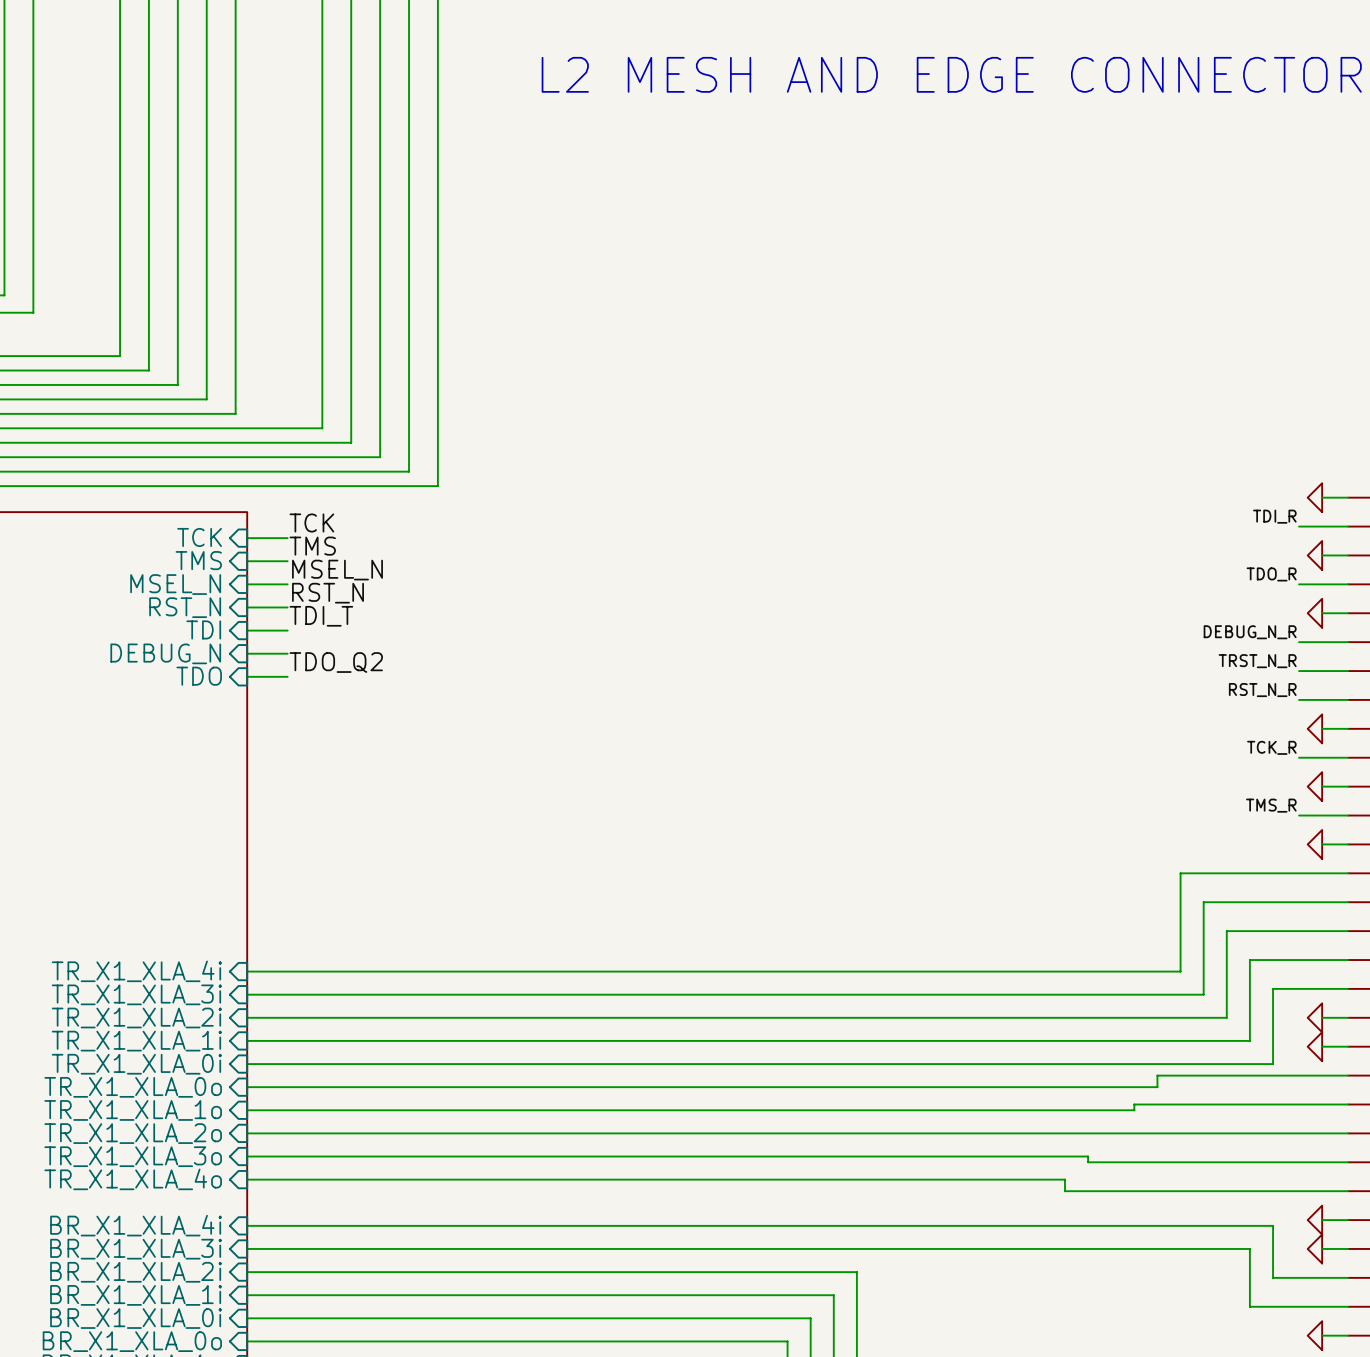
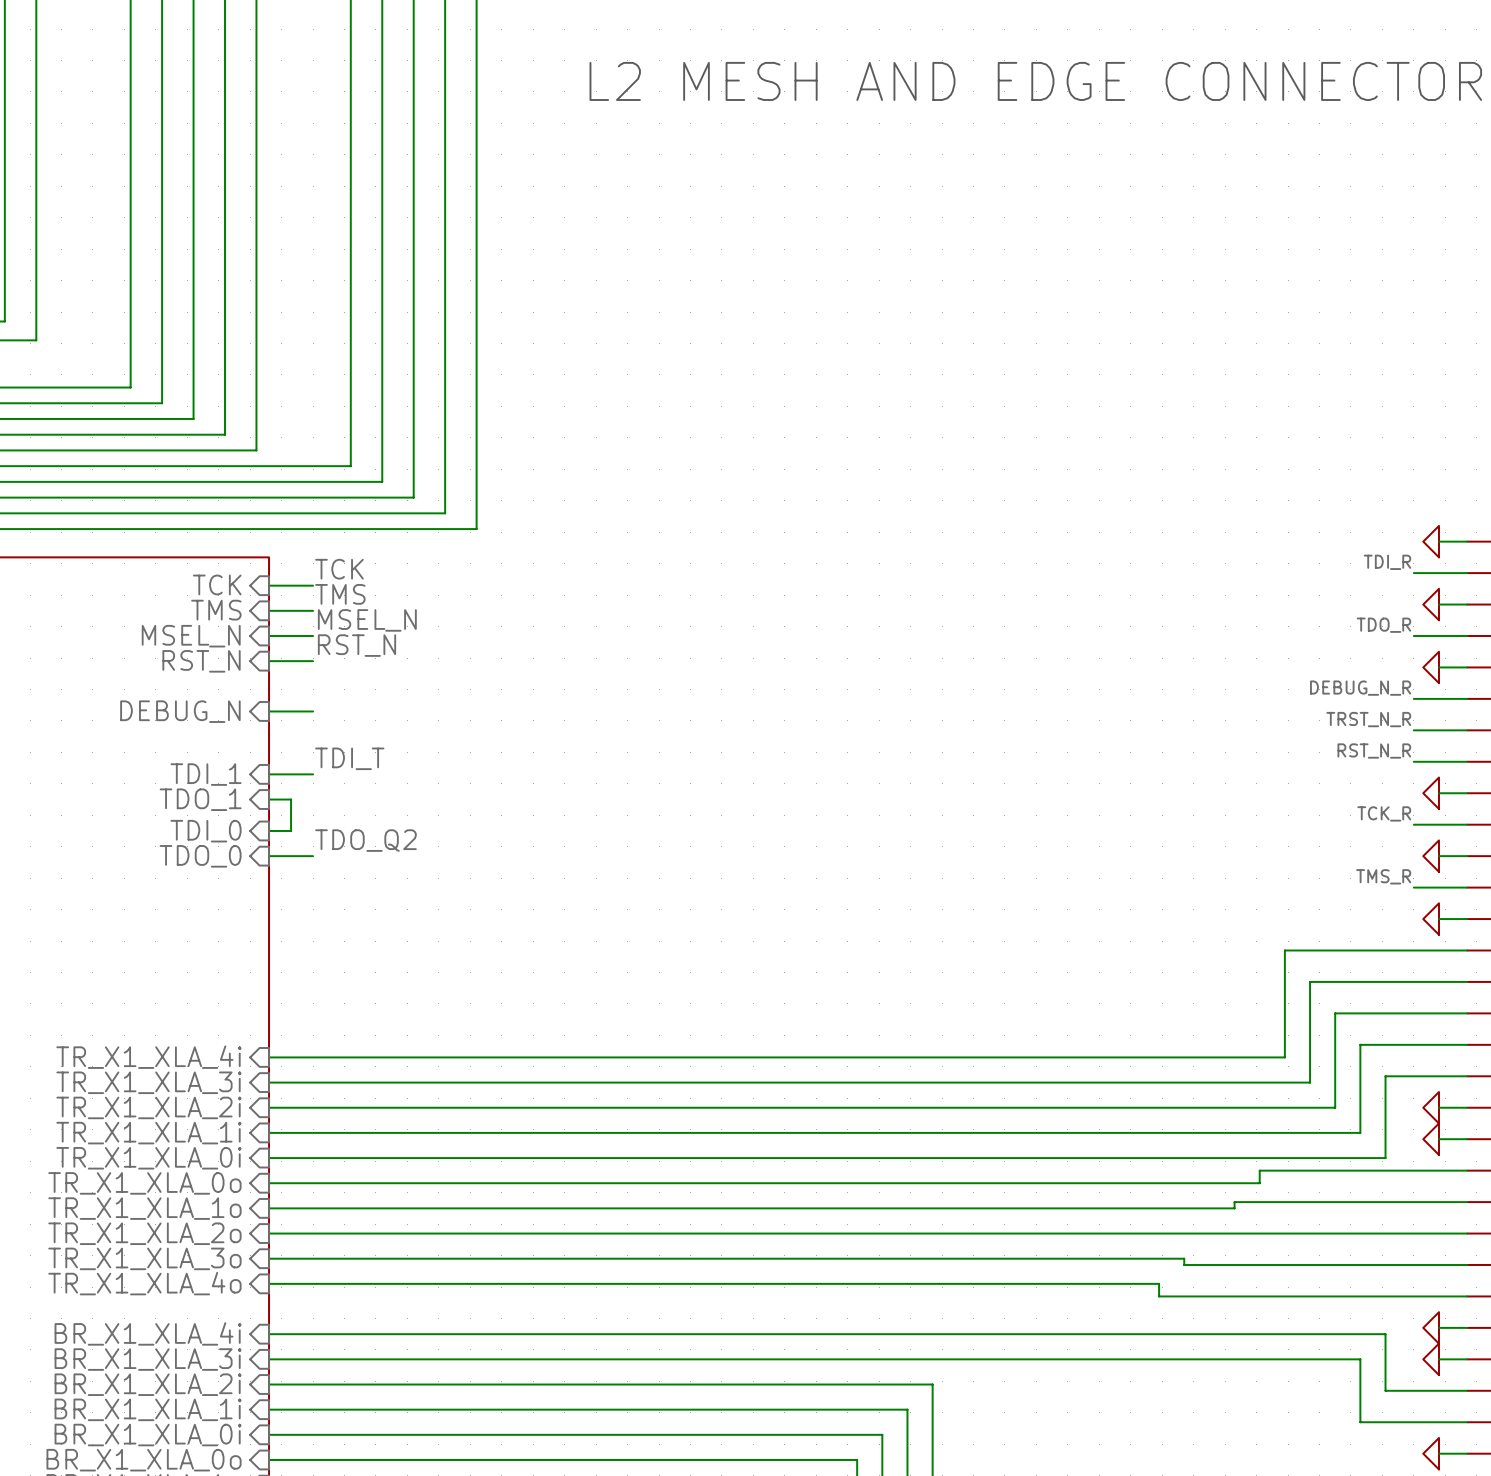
label position: TDI_T (321, 616) -> TDI_T (349, 758)
sheet pin: TDI (203, 629) -> none
wire: (247, 630) (287, 630) -> (269, 856) (313, 856)
label position: TDO_Q2 (336, 662) -> TDO_Q2 (365, 840)
sheet pin: TDO (199, 676) -> none
wire: (247, 676) (287, 676) -> (269, 774) (313, 774)
sheet pin: none -> TDI_1 (206, 774)
sheet pin: none -> TDO_1 (200, 799)
wire: none -> (269, 799) (291, 799) (291, 830) (269, 830)
sheet pin: none -> TDI_0 (206, 831)
sheet pin: none -> TDO_0 (200, 856)

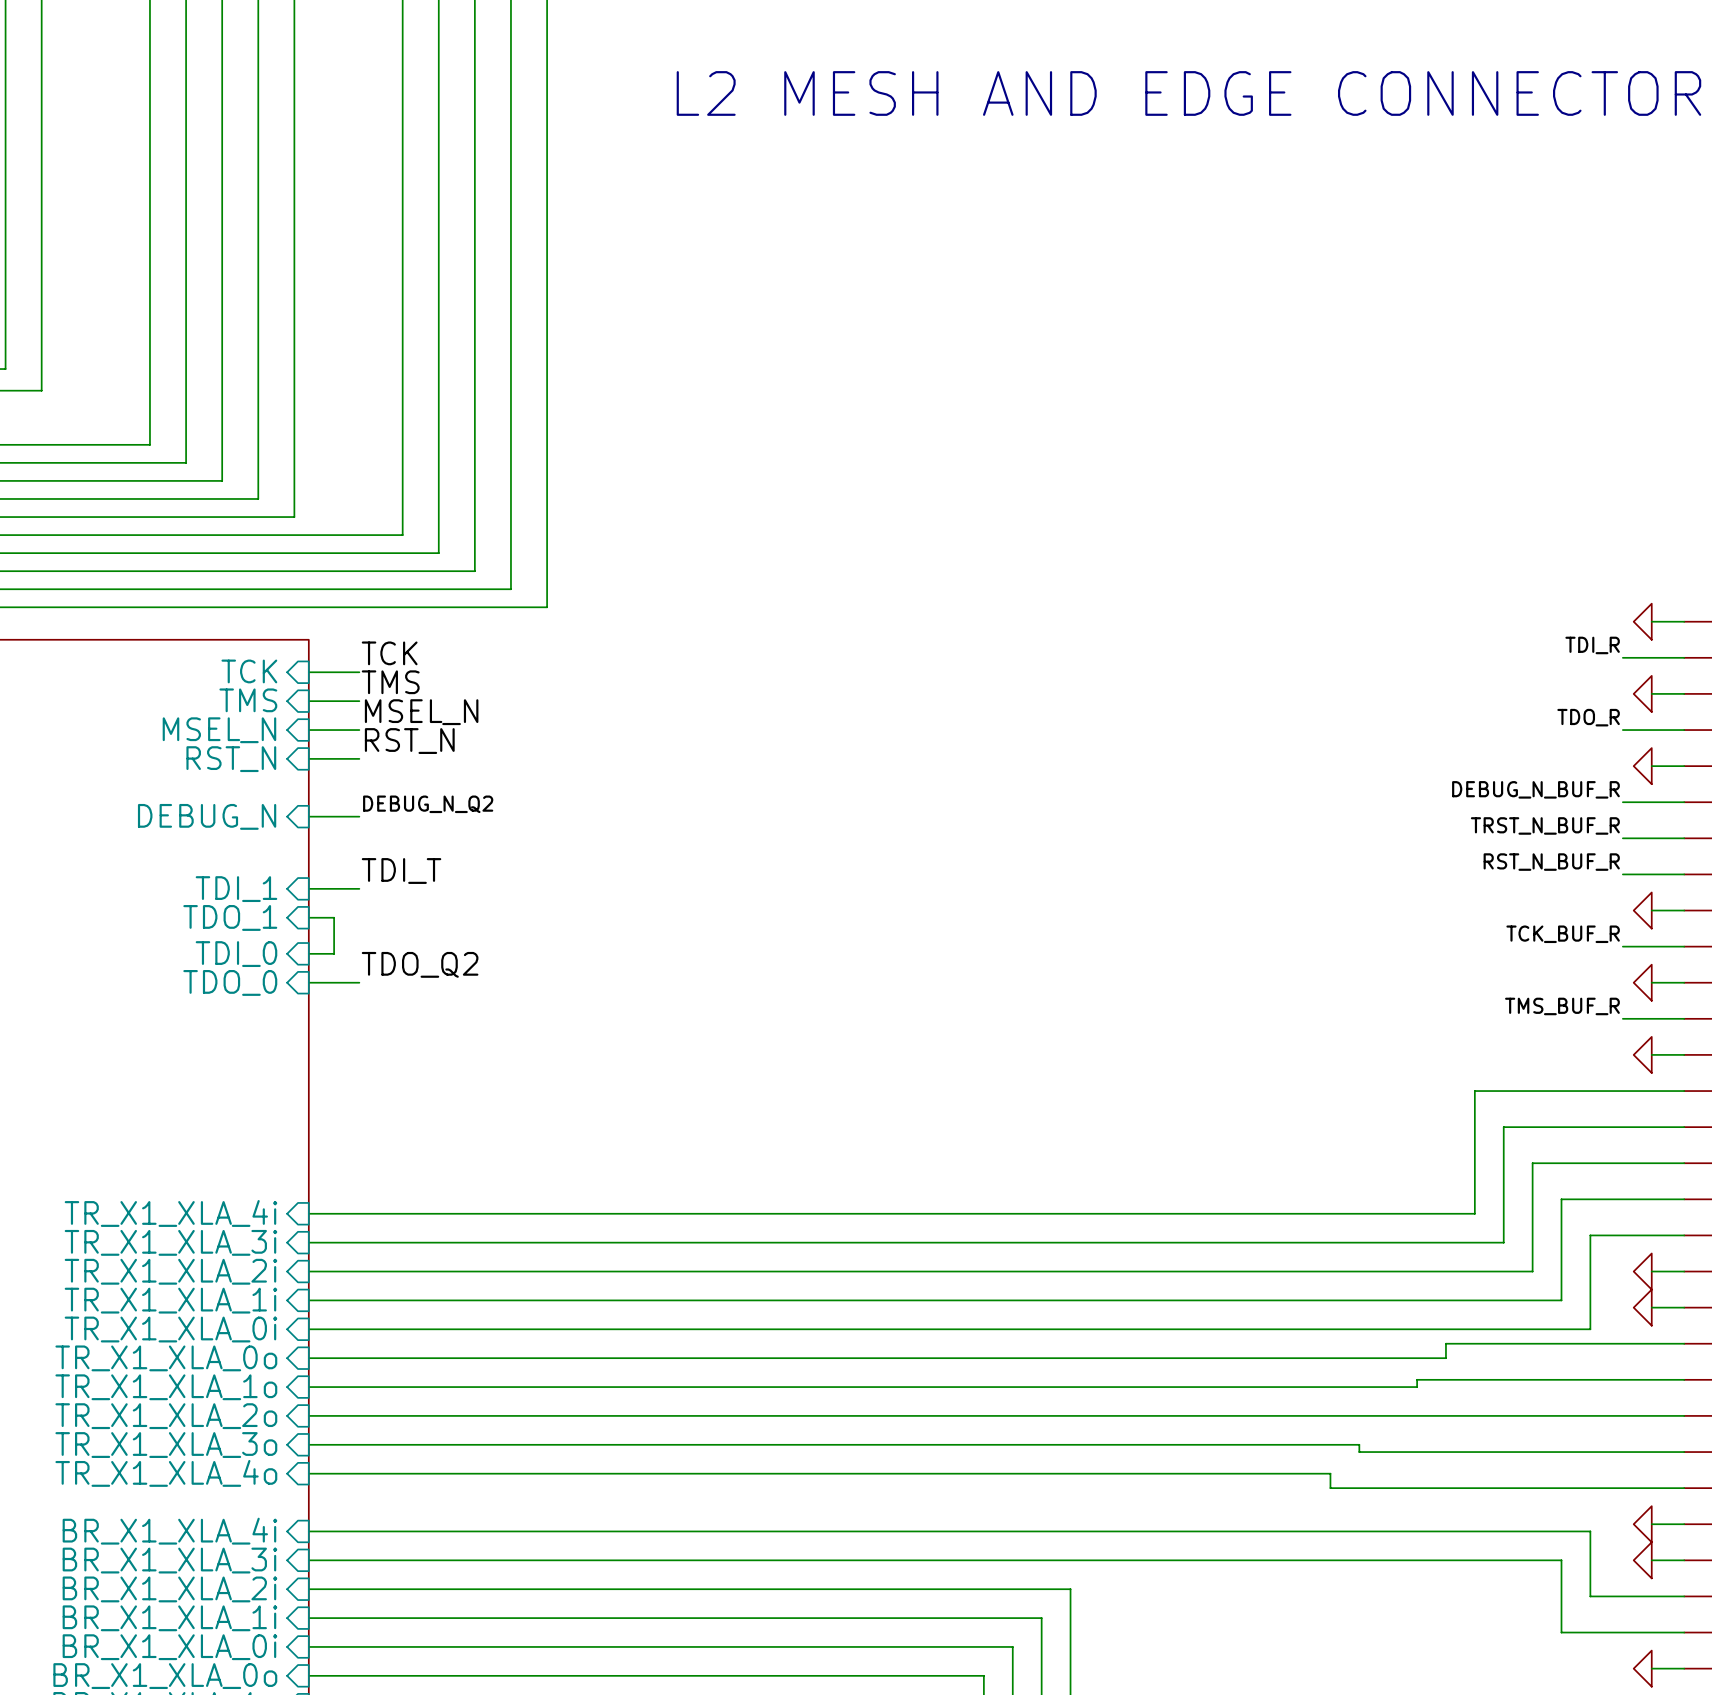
label: DEBUG_N_R (1360, 688) -> DEBUG_N_BUF_R (1535, 789)
label: none -> DEBUG_N_Q2 (428, 804)
label: TRST_N_R (1368, 719) -> TRST_N_BUF_R (1545, 825)
label: RST_N_R (1374, 751) -> RST_N_BUF_R (1551, 862)
label: TCK_R (1384, 813) -> TCK_BUF_R (1563, 934)
label: TMS_R (1383, 876) -> TMS_BUF_R (1562, 1006)

